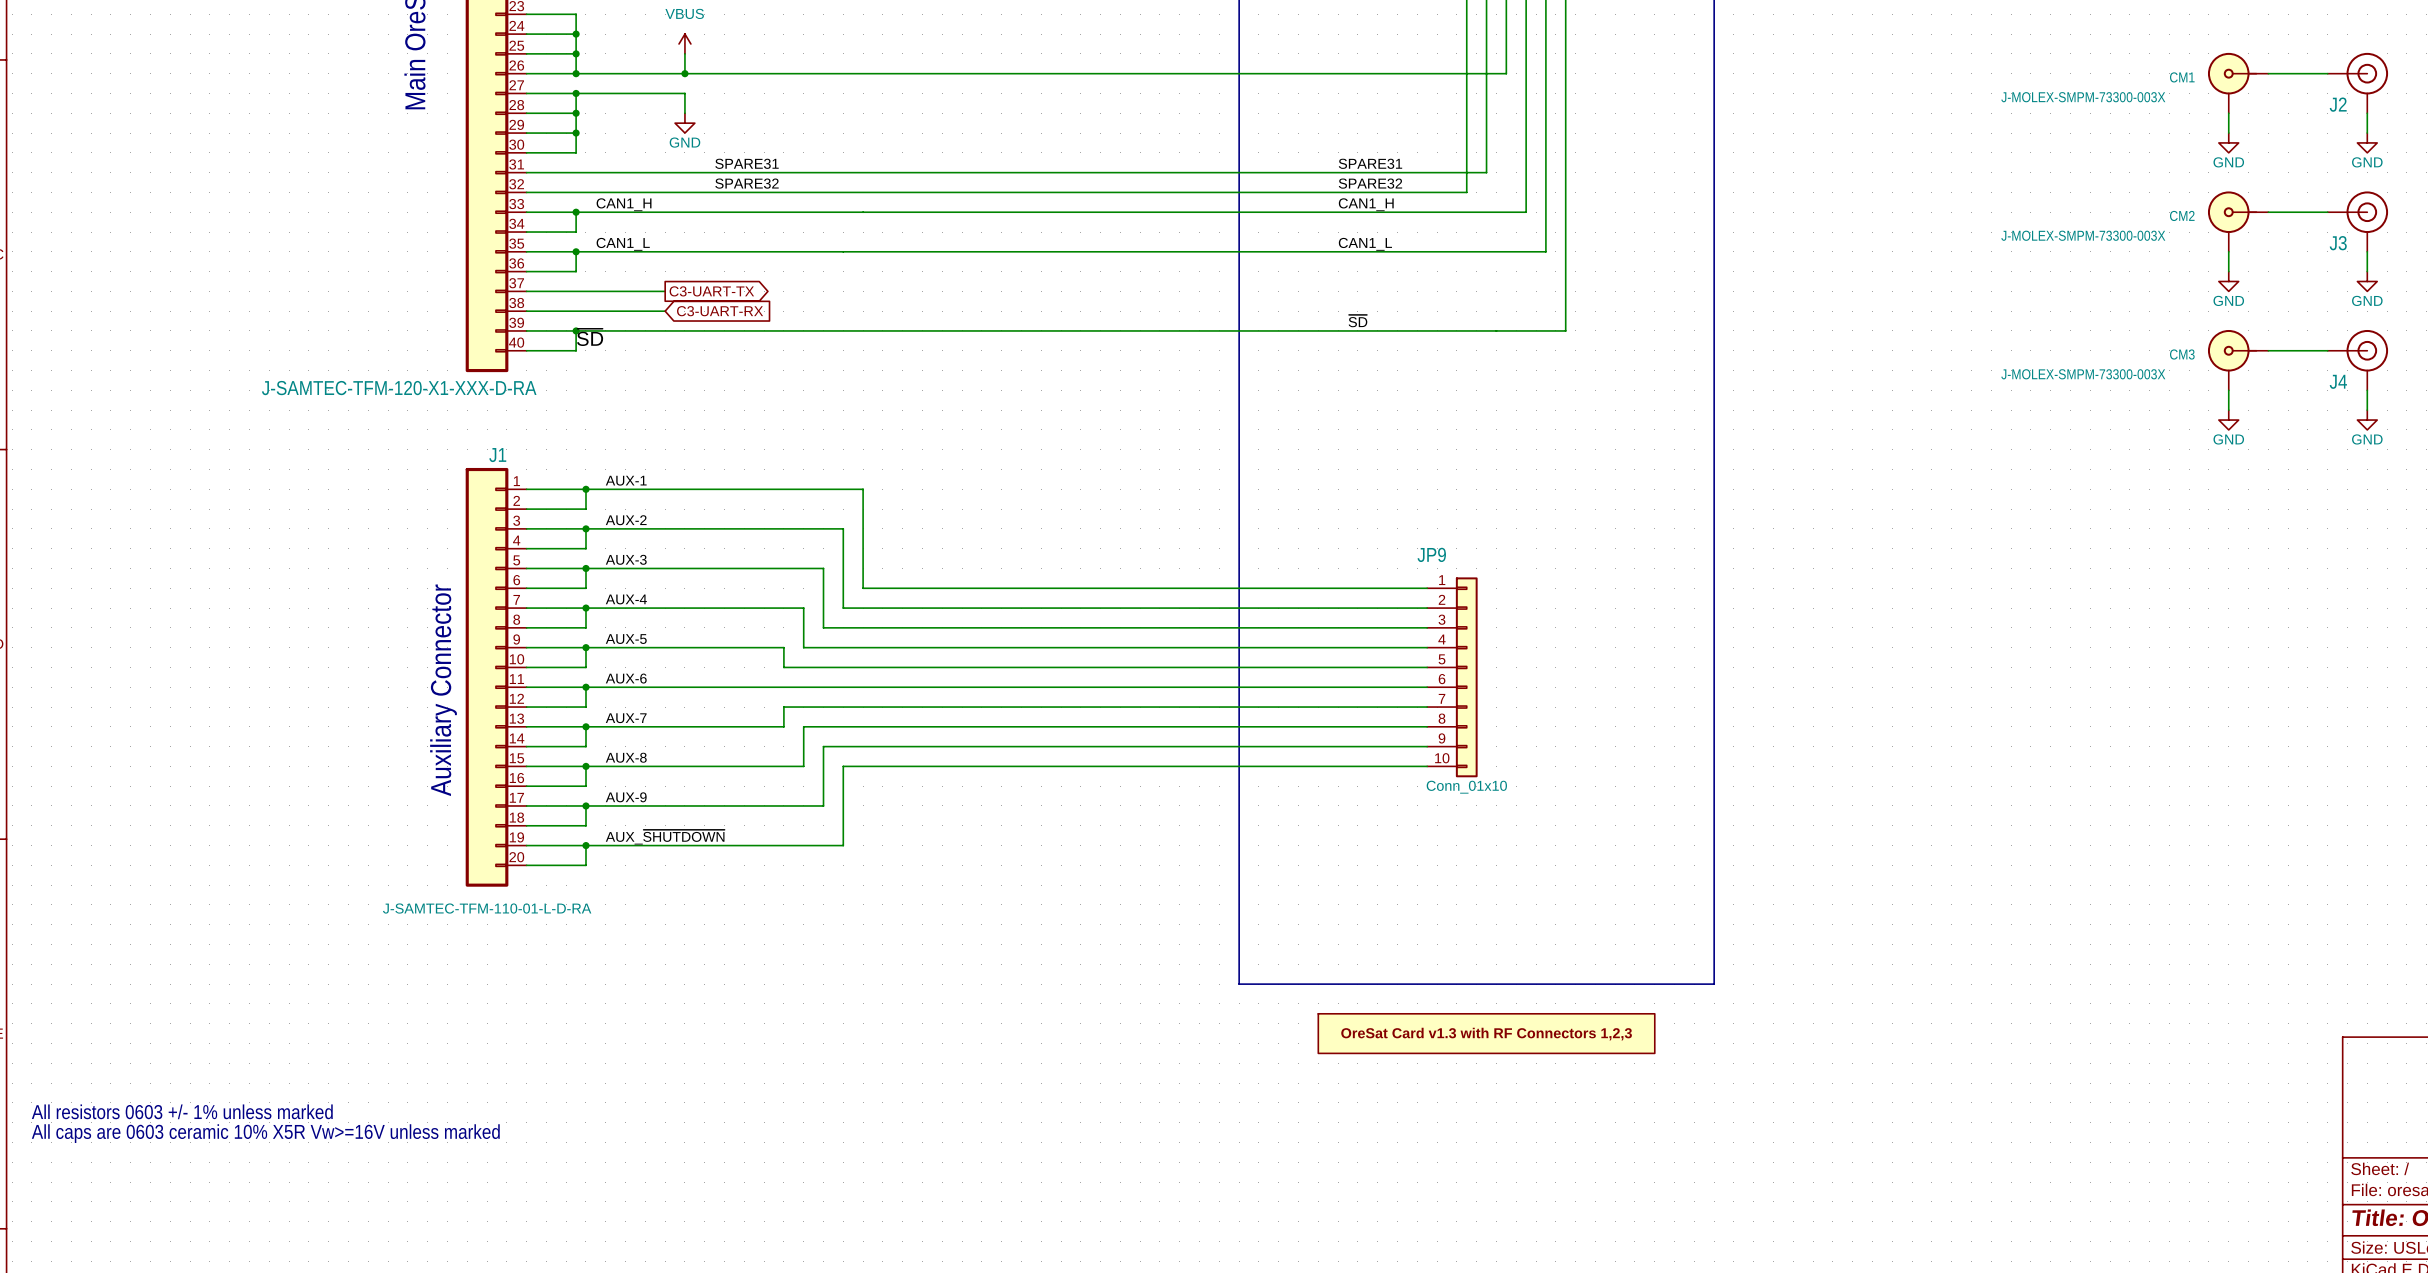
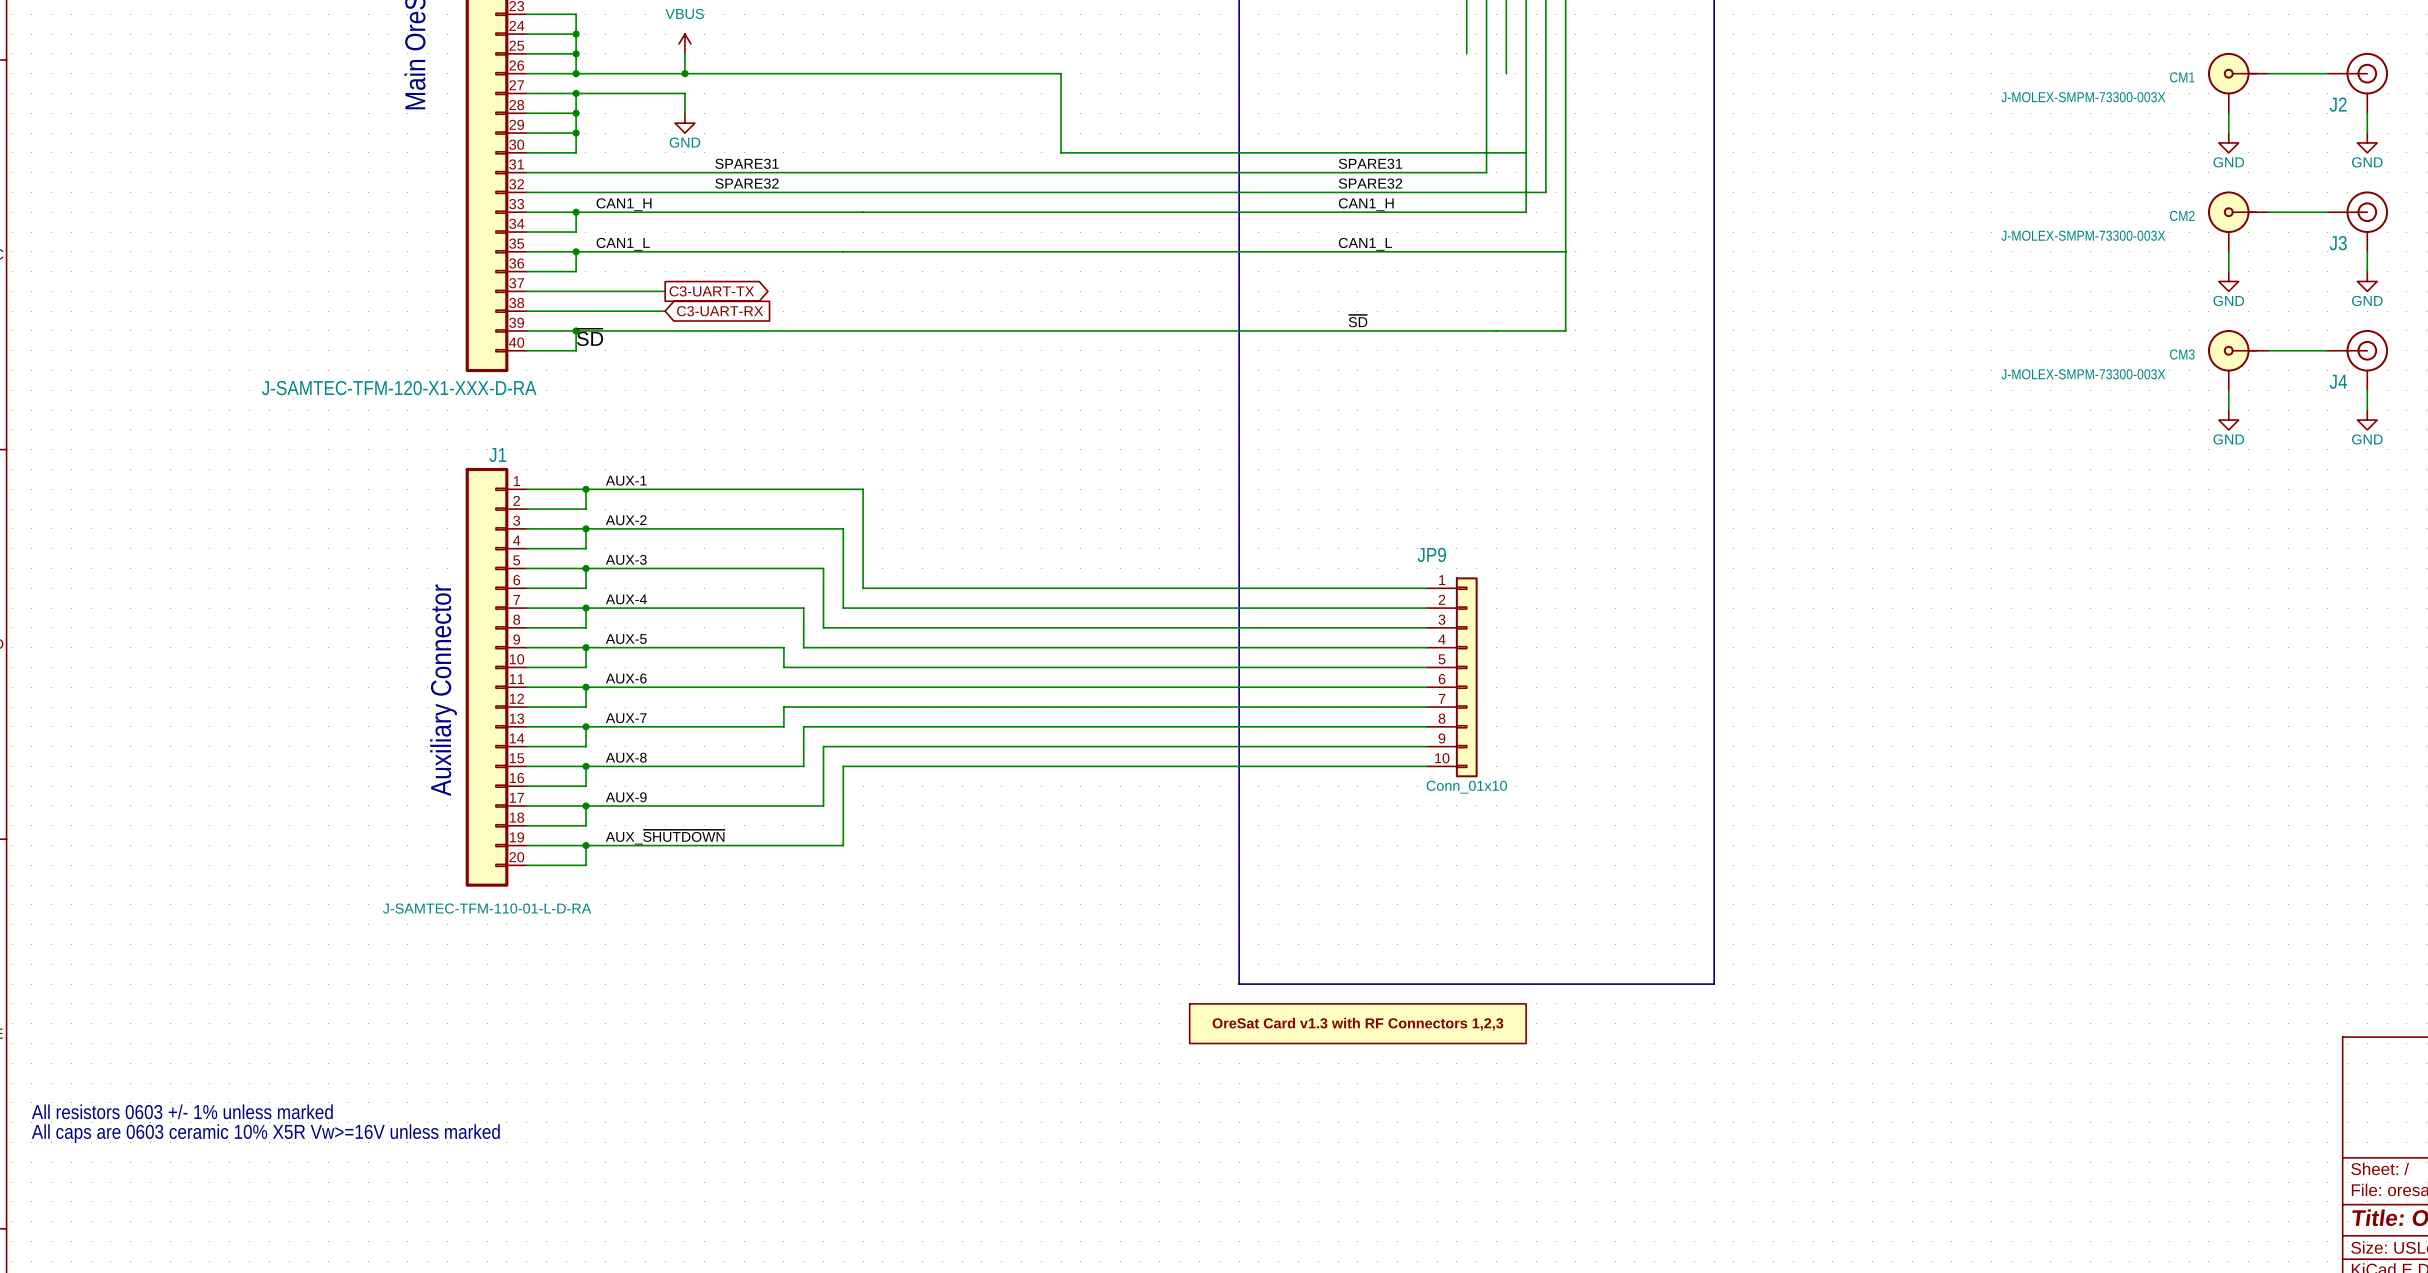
wire: (1466, 53) (1466, 192) -> (1545, 192) (1466, 192)
wire: (1061, 73) (1506, 73) -> (1061, 73) (1061, 152) (1526, 152)
wire: (1545, 192) (1545, 251) -> (1565, 251) (1545, 251)
part position: (1486, 1033) -> (1357, 1023)

